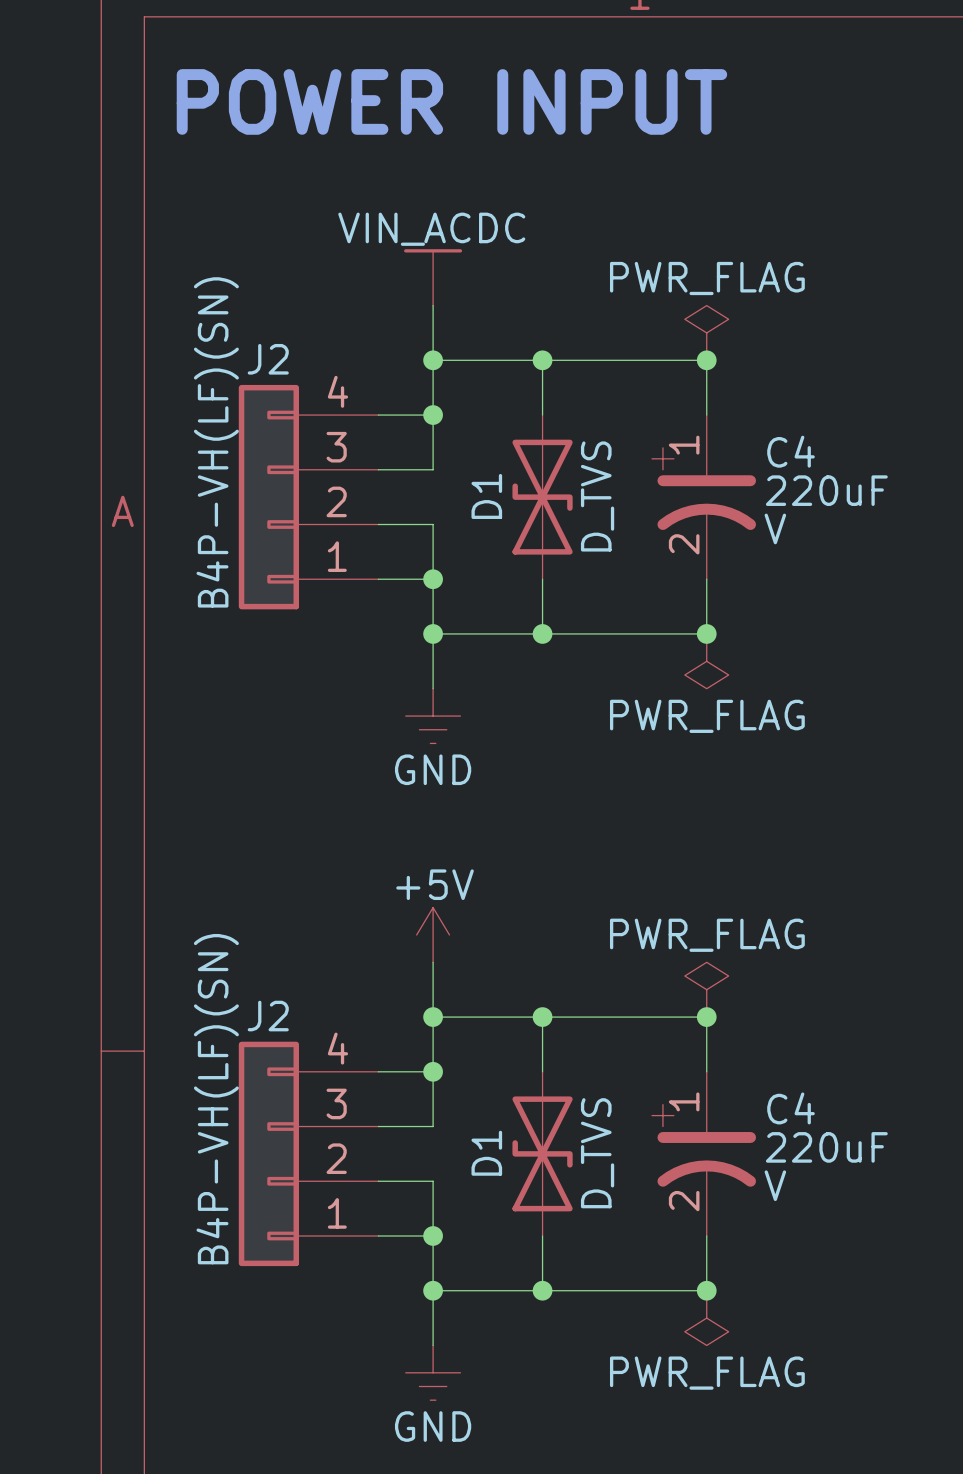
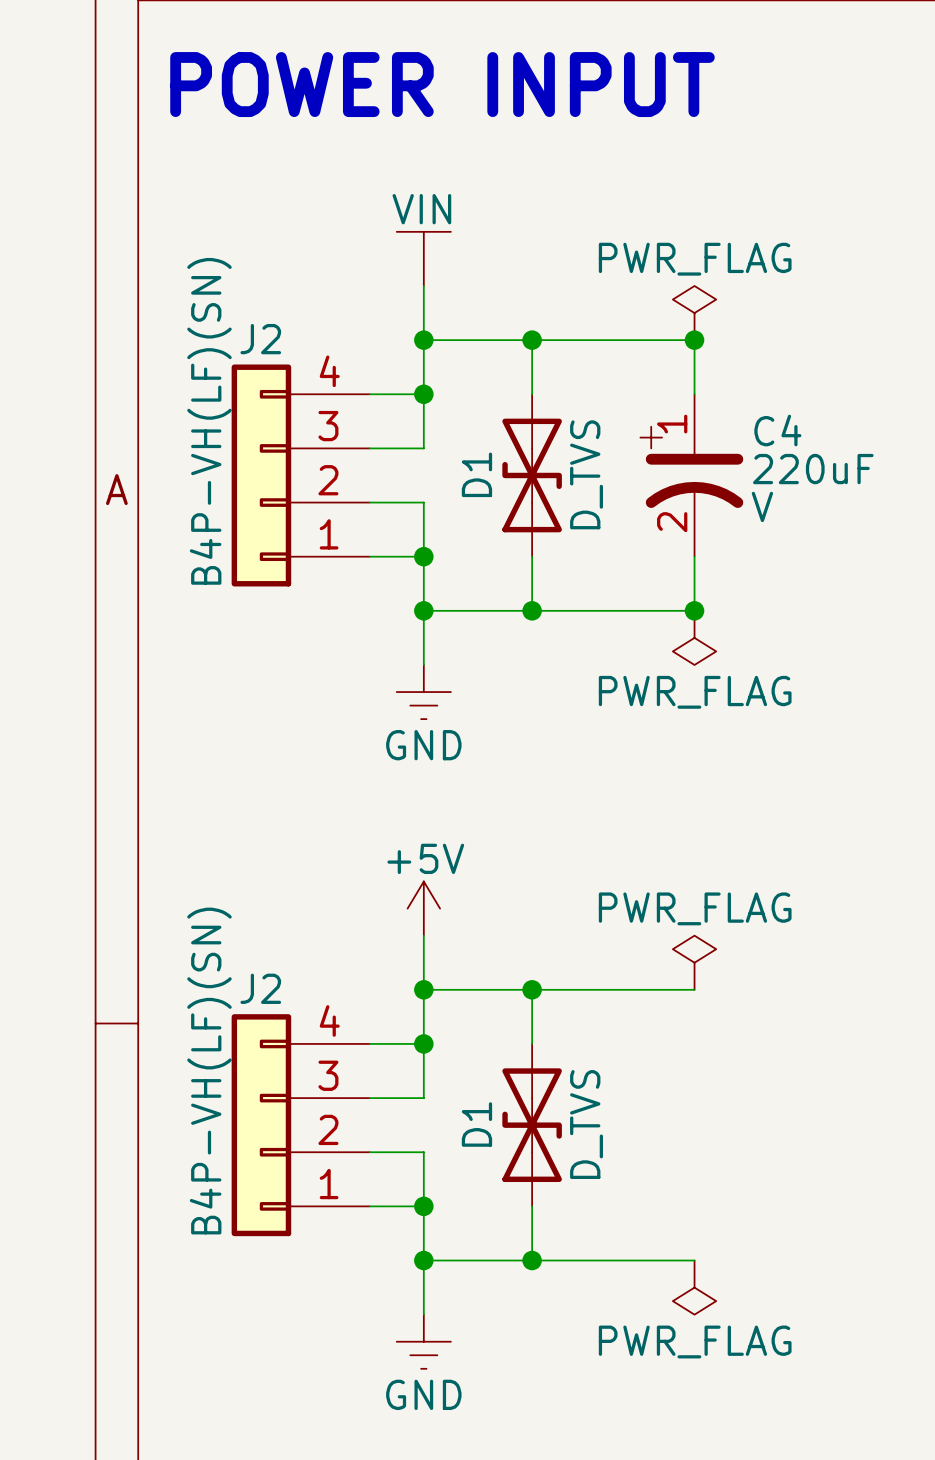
power symbol: VIN_ACDC (433, 277) -> VIN (423, 258)
wire: (706, 1017) (706, 1071) -> none
junction: (706, 1017) -> none
C4: 220uF (704, 1153) -> none
wire: (706, 1235) (706, 1290) -> none
junction: (706, 1290) -> none

